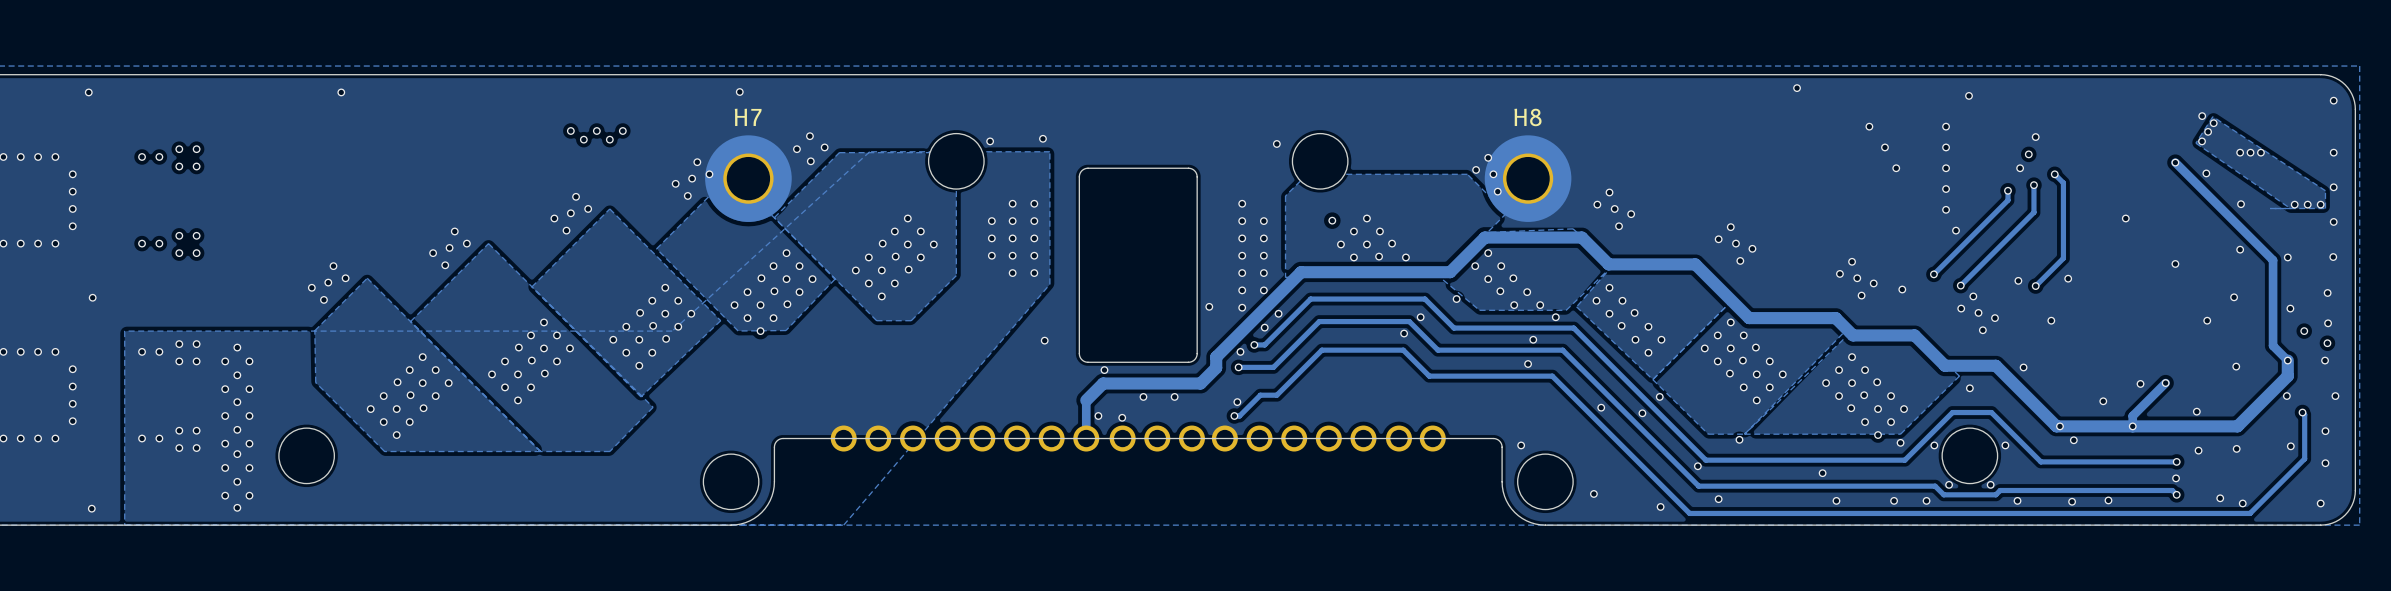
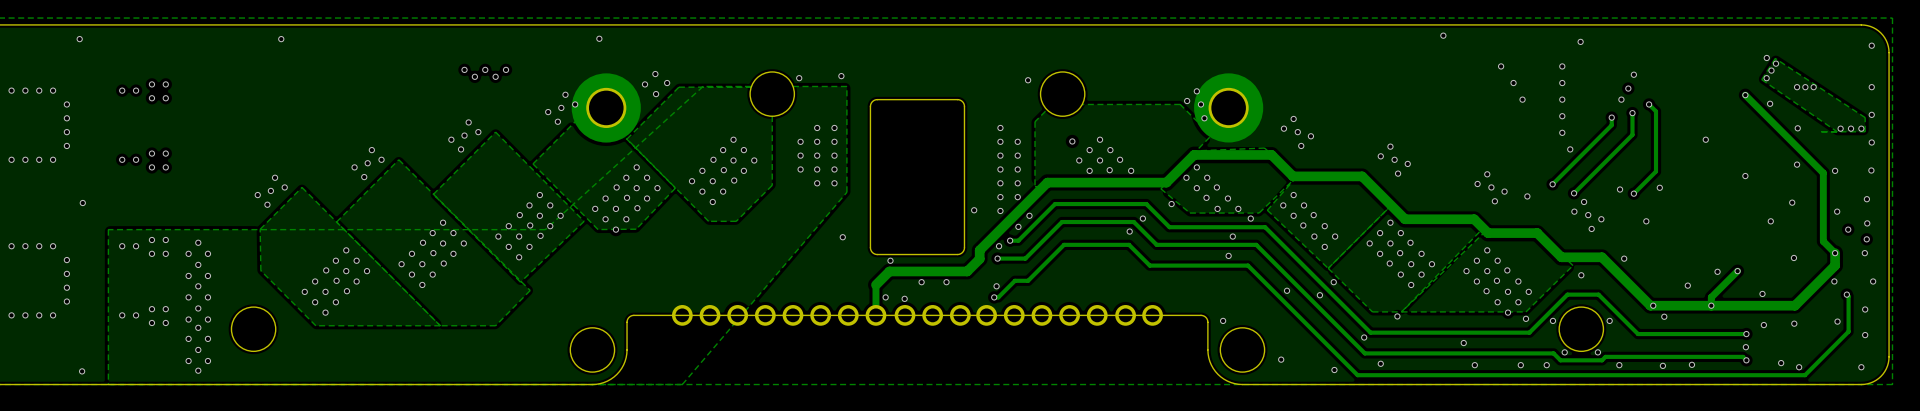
H7 name: H7 (748, 117) -> none
H8 name: H8 (1527, 117) -> none

